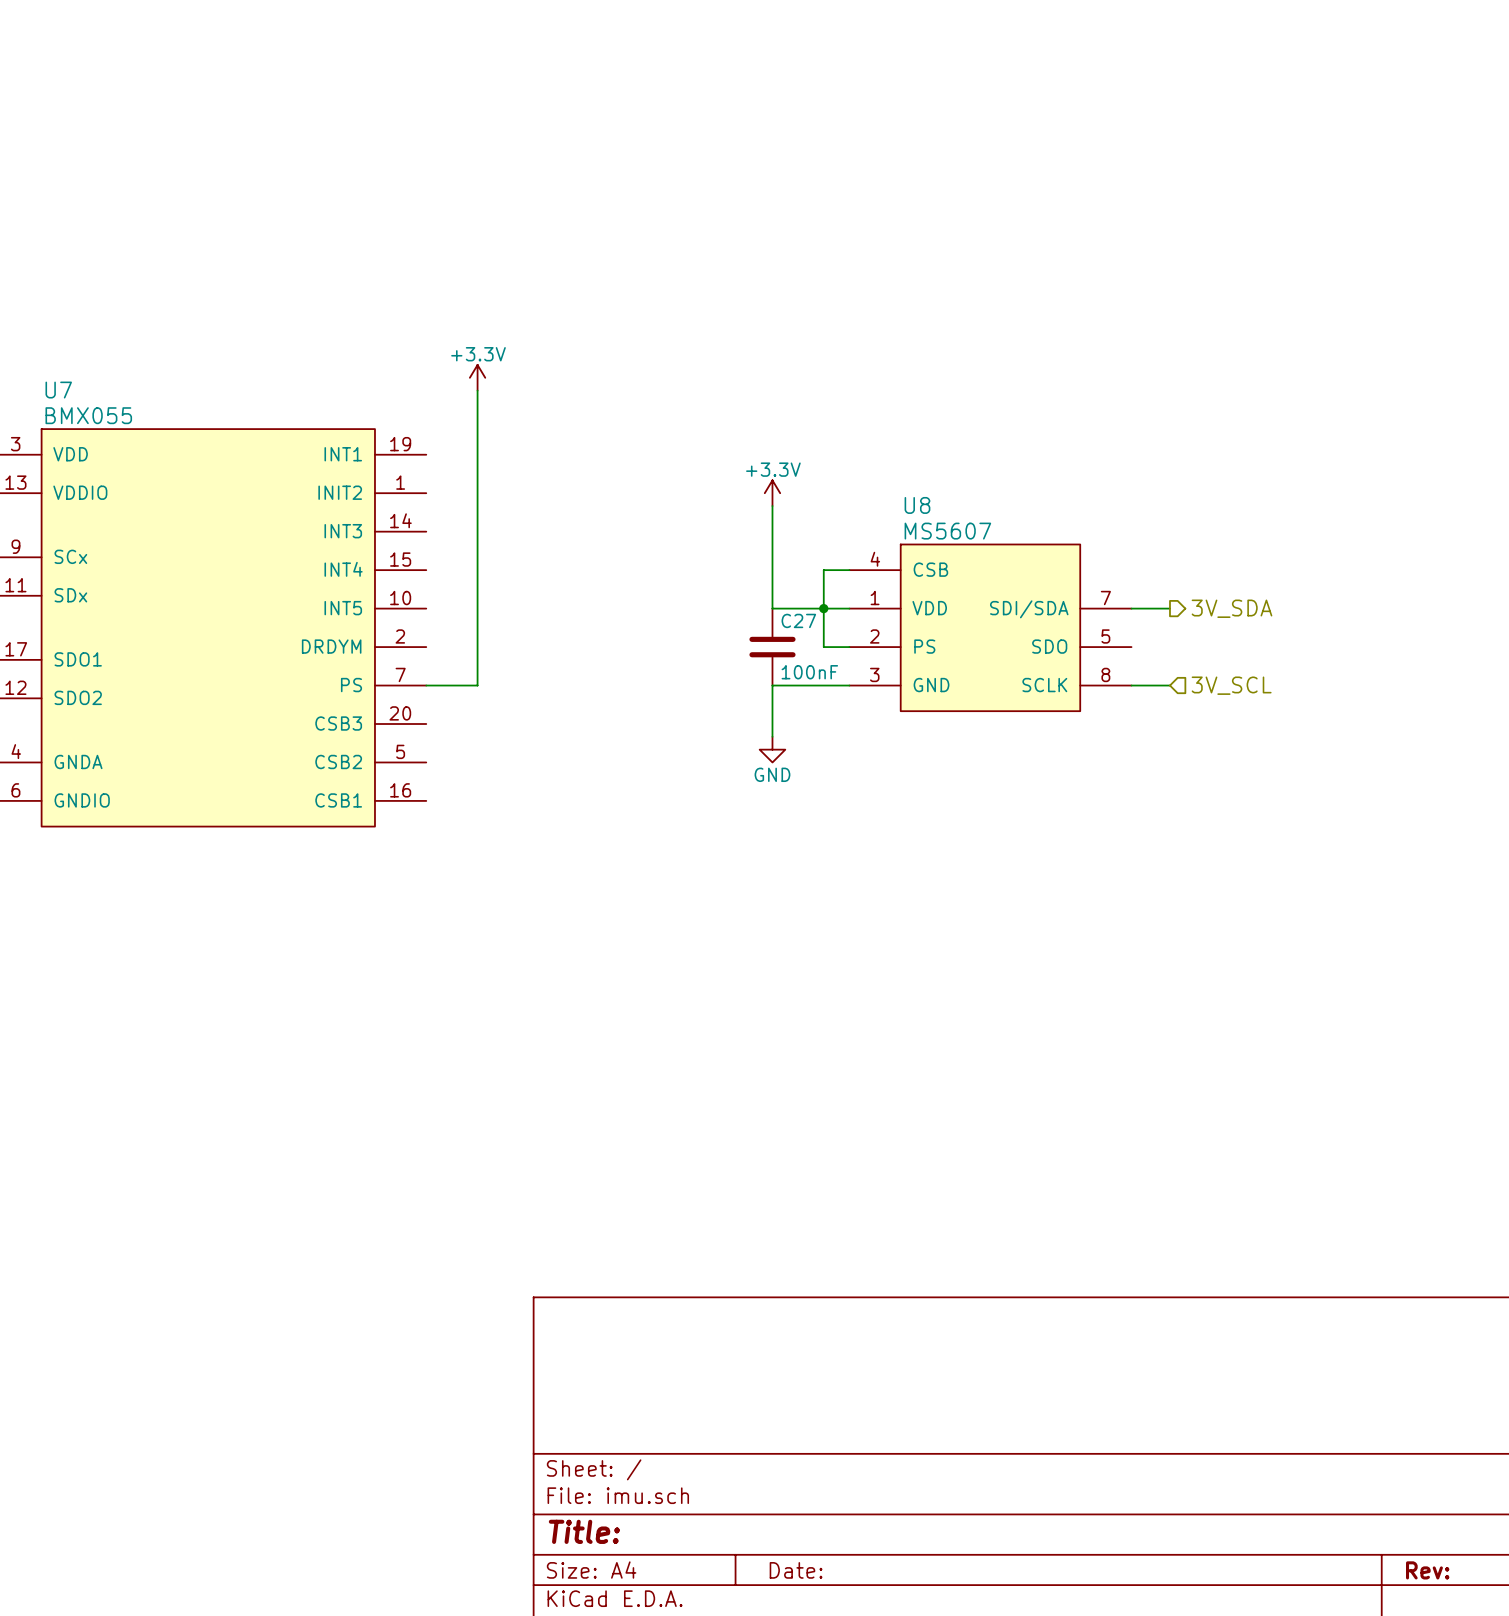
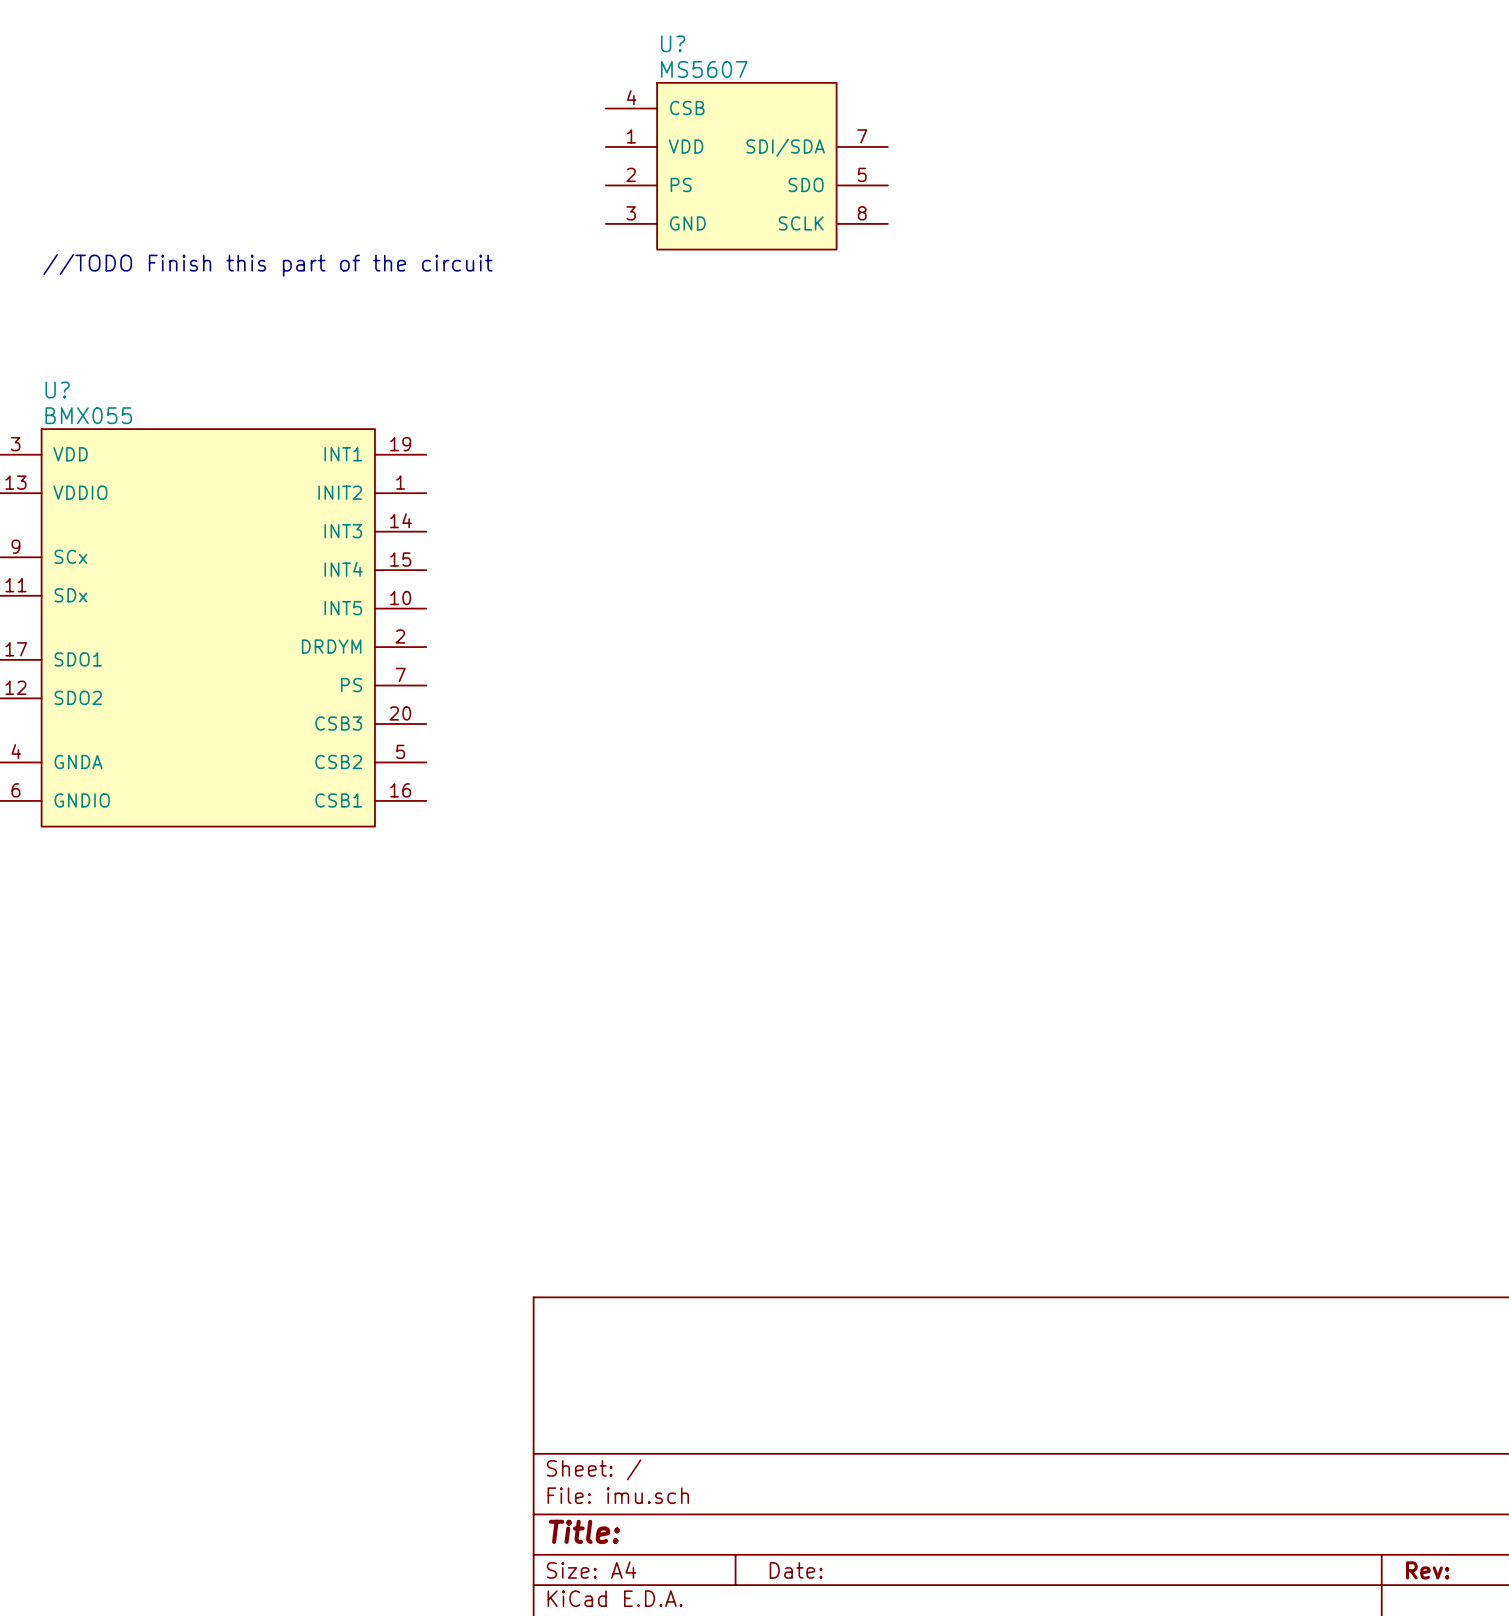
U?: none -> MS5607 (746, 166)
text: none -> //TODO Finish this part of the circuit (267, 265)
power symbol: +3.3V (477, 377) -> none
U7 name: U7 (58, 390) -> U? (57, 390)
wire: (477, 390) (477, 685) (426, 685) -> none
power symbol: +3.3V (772, 493) -> none
wire: (772, 506) (772, 608) (849, 608) -> none
wire: (849, 570) (823, 570) (823, 647) (849, 647) -> none
junction: (823, 608) -> none
wire: (1131, 608) (1169, 608) -> none
hierarchical label: 3V_SDA (1231, 608) -> none
U8: MS5607 (990, 627) -> none
C27: 100nF (772, 647) -> none
wire: (849, 685) (772, 685) (772, 736) -> none
wire: (1131, 685) (1169, 685) -> none
hierarchical label: 3V_SCL (1231, 685) -> none
power symbol: GND (772, 749) -> none

